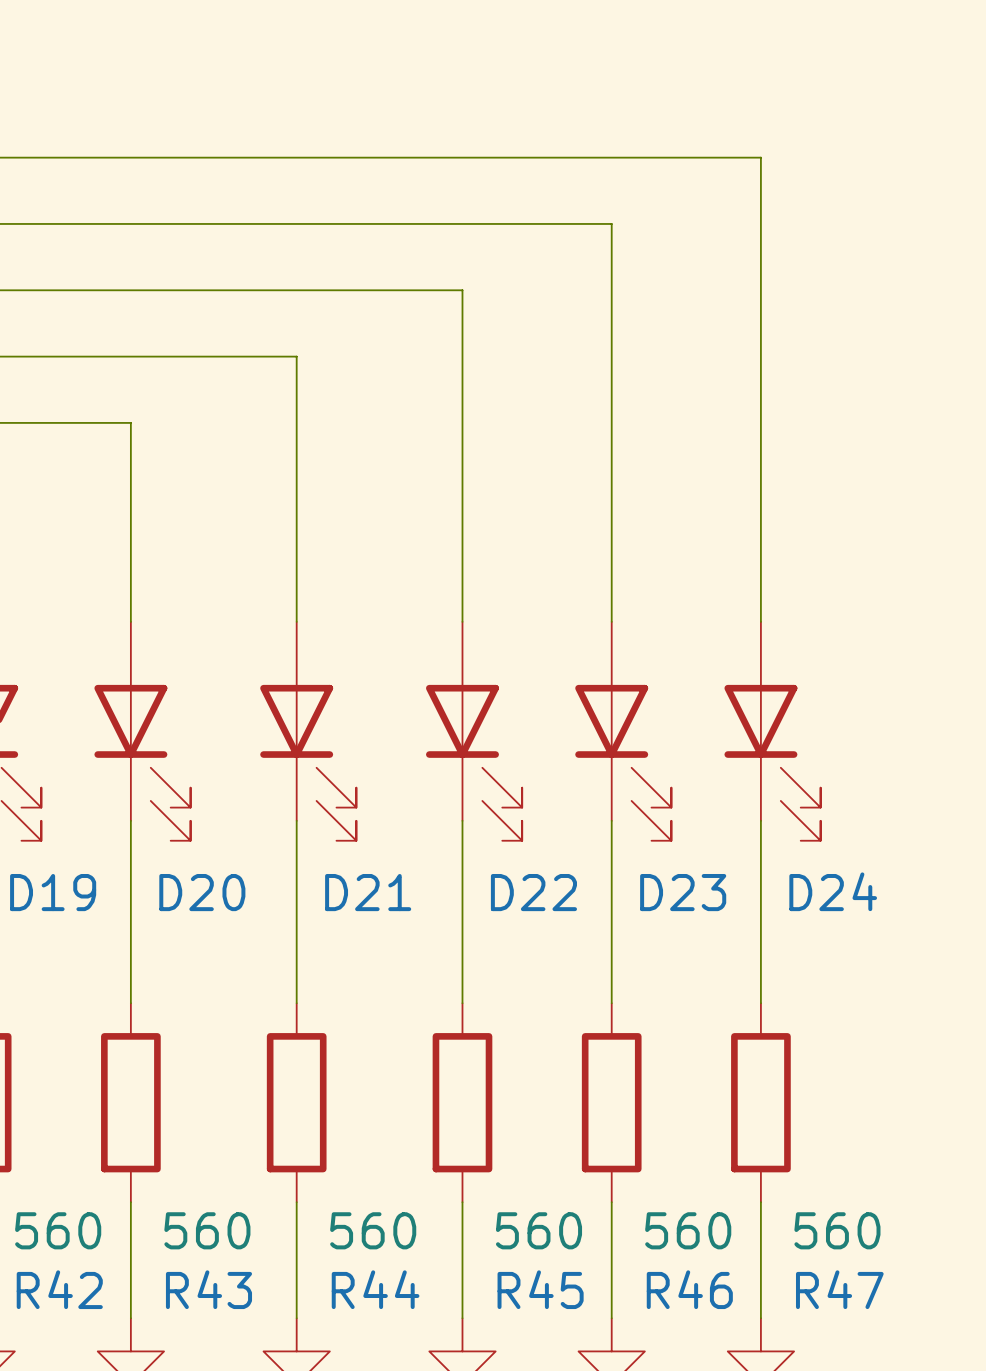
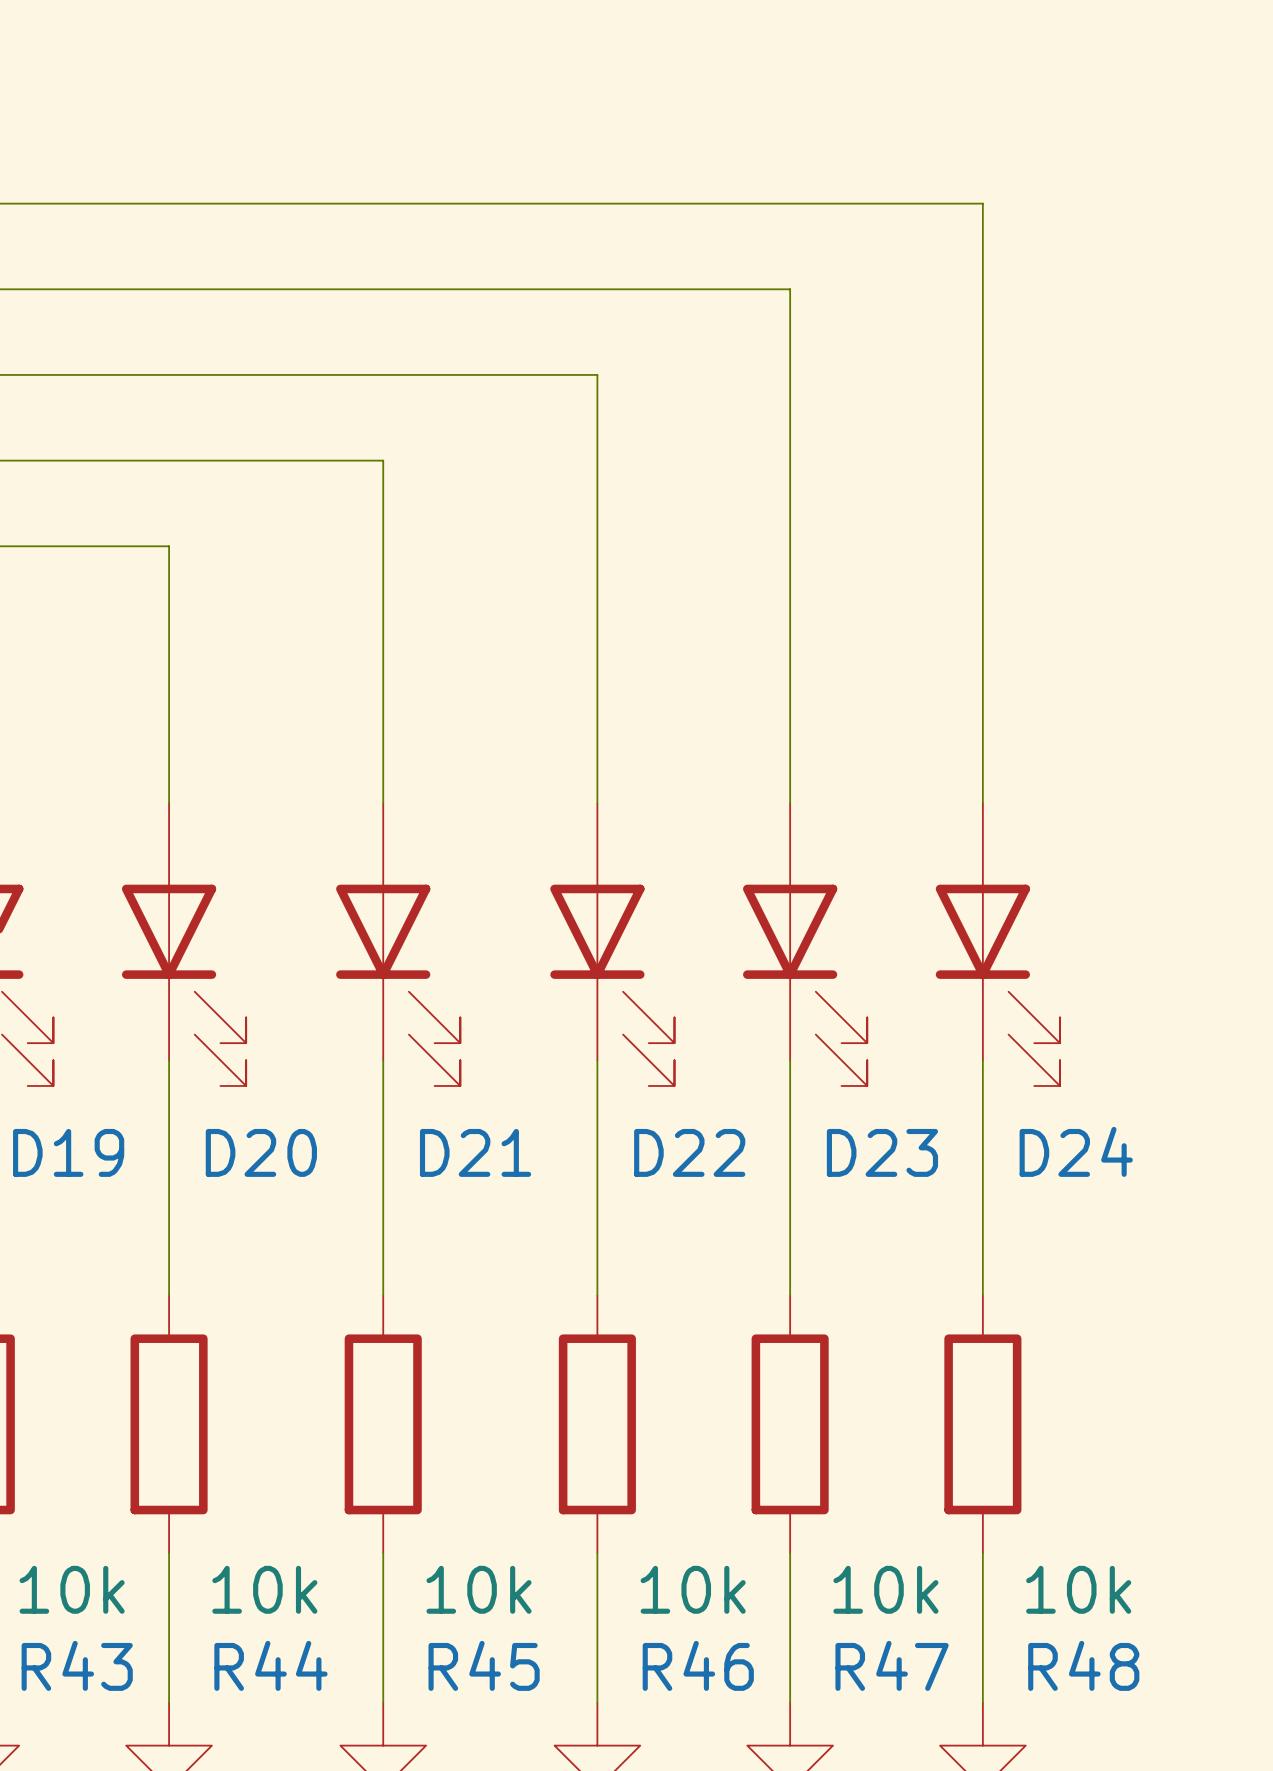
R42 value: 560 (58, 1230) -> 10k (72, 1589)
R43 value: 560 (207, 1230) -> 10k (264, 1589)
R44 value: 560 (373, 1230) -> 10k (479, 1589)
R45 value: 560 (539, 1230) -> 10k (693, 1589)
R46 value: 560 (688, 1230) -> 10k (885, 1589)
R47 value: 560 (837, 1230) -> 10k (1078, 1589)
R42 name: R42 (59, 1289) -> R43 (77, 1665)
R43 name: R43 (208, 1289) -> R44 (270, 1665)
R44 name: R44 (375, 1289) -> R45 (484, 1665)
R45 name: R45 (540, 1289) -> R46 (698, 1665)
R46 name: R46 (689, 1289) -> R47 (892, 1665)
R47 name: R47 (839, 1289) -> R48 (1083, 1665)

